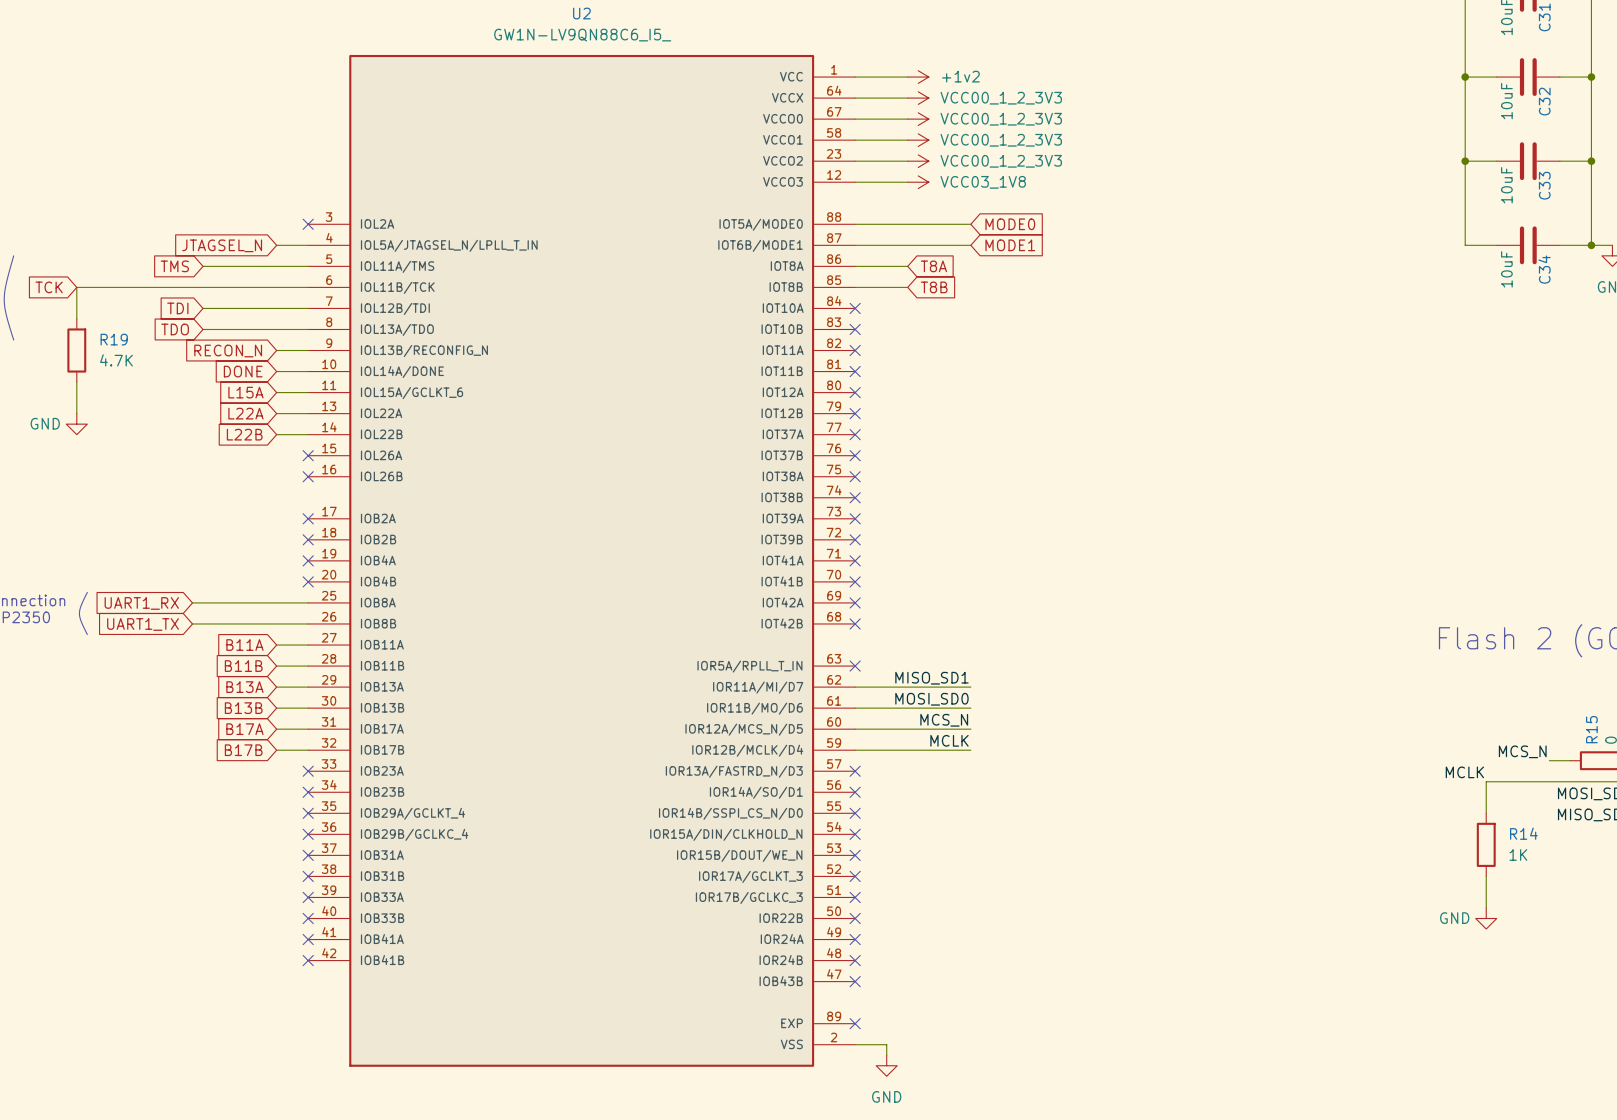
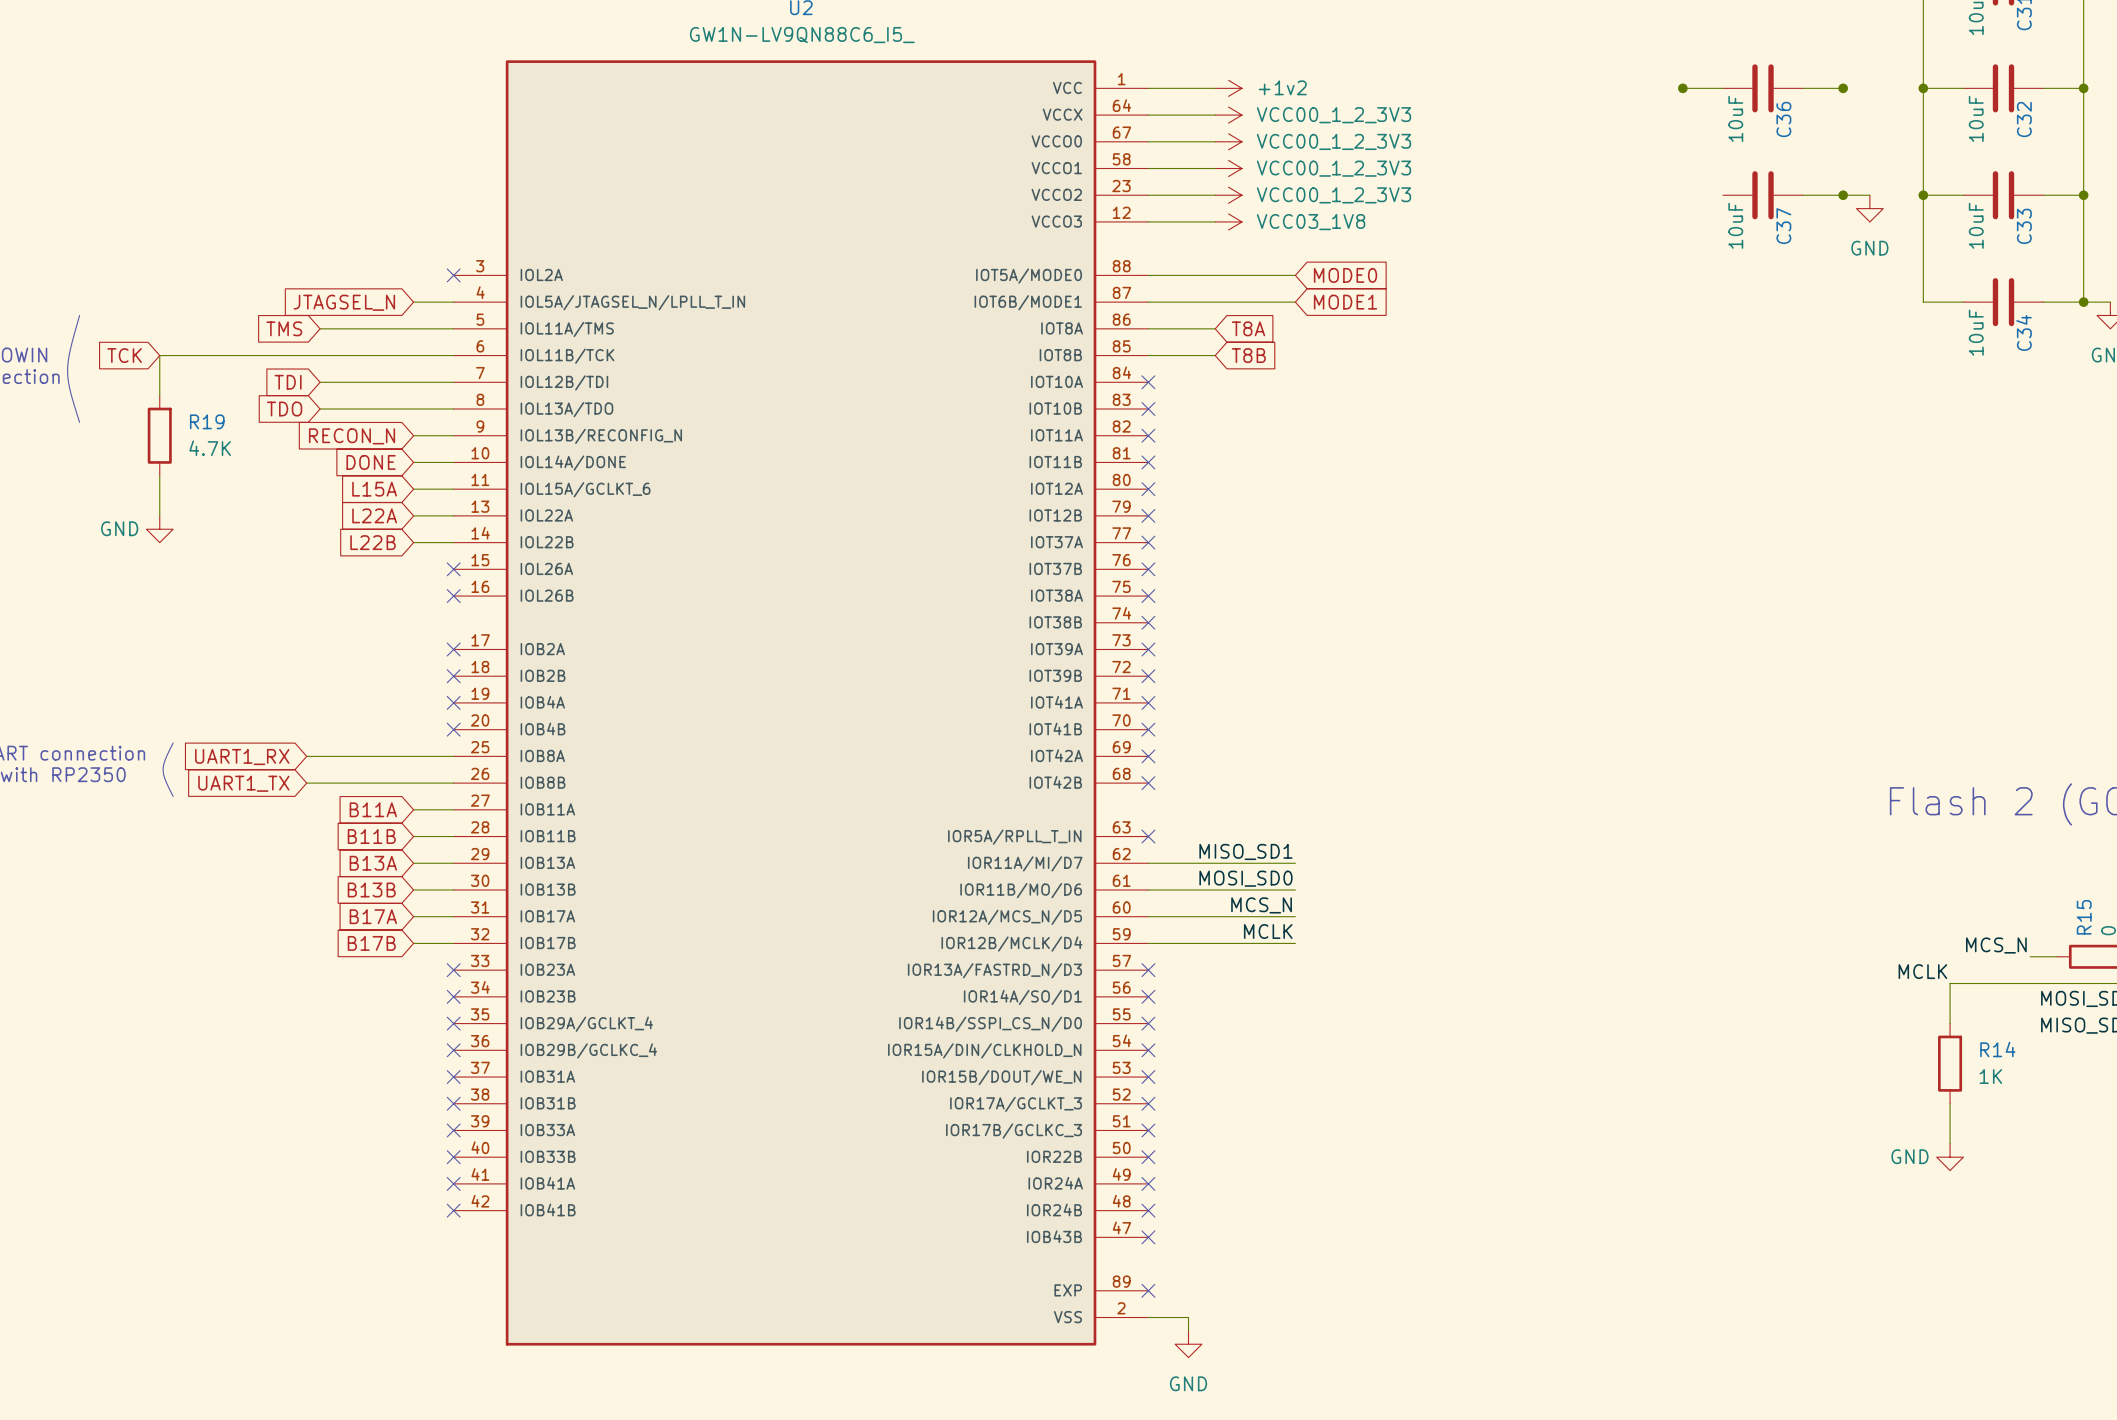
wire: none -> (1682, 88) (1722, 88)
junction: none -> (1682, 88)
C36: none -> 10uF (1763, 88)
wire: none -> (1803, 88) (1843, 88)
junction: none -> (1843, 88)
C37: none -> 10uF (1763, 195)
wire: none -> (1803, 195) (1869, 195)
junction: none -> (1843, 195)
power symbol: none -> GND (1869, 208)

